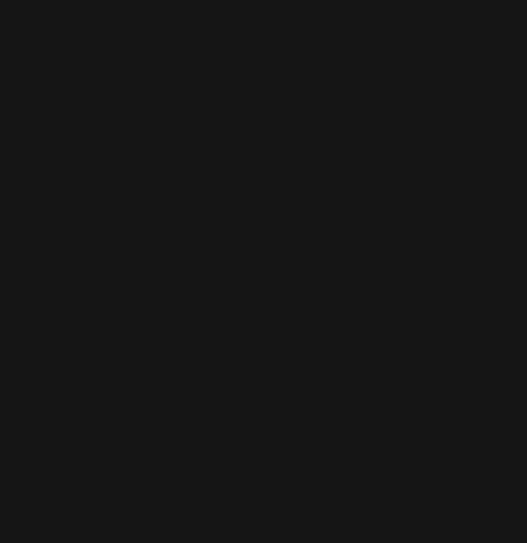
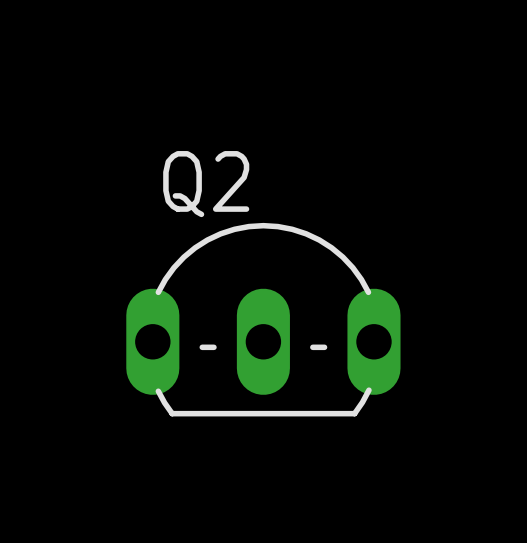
Q2: none -> (263, 319)

